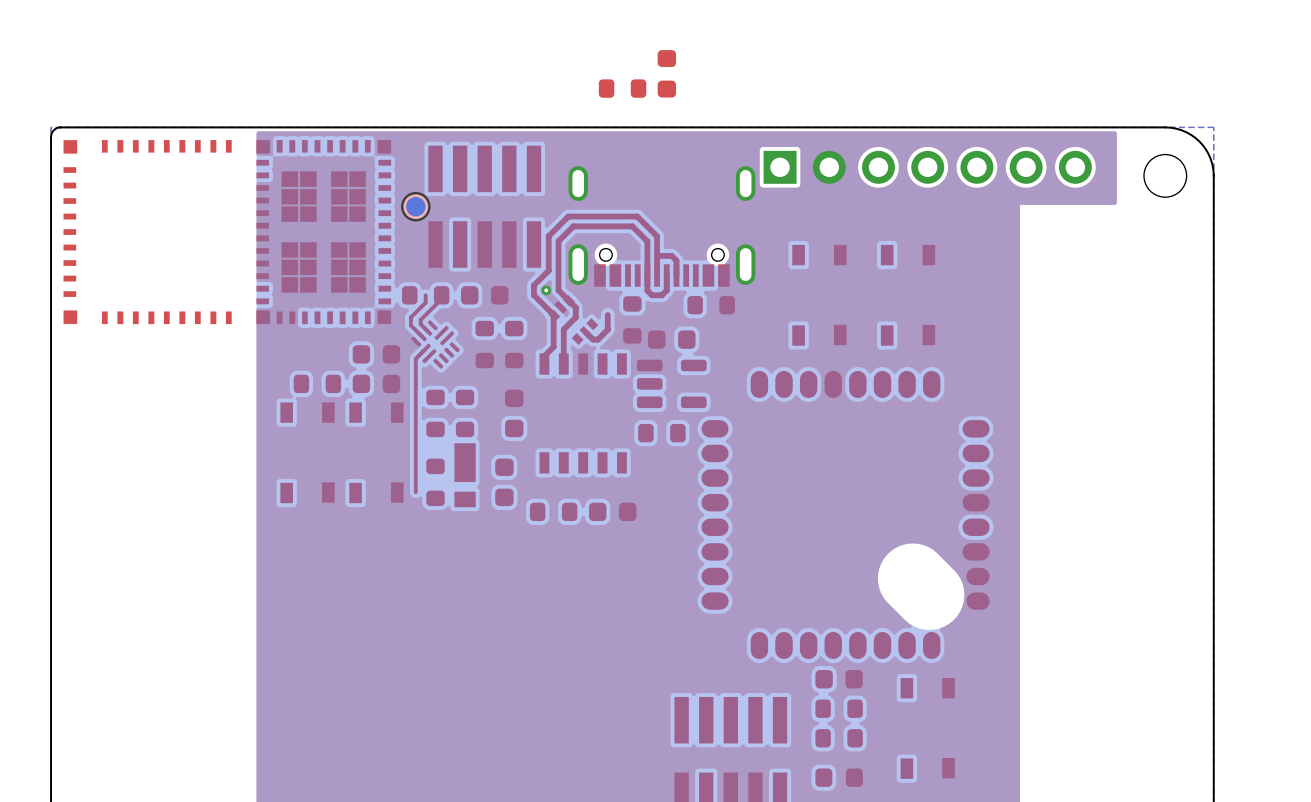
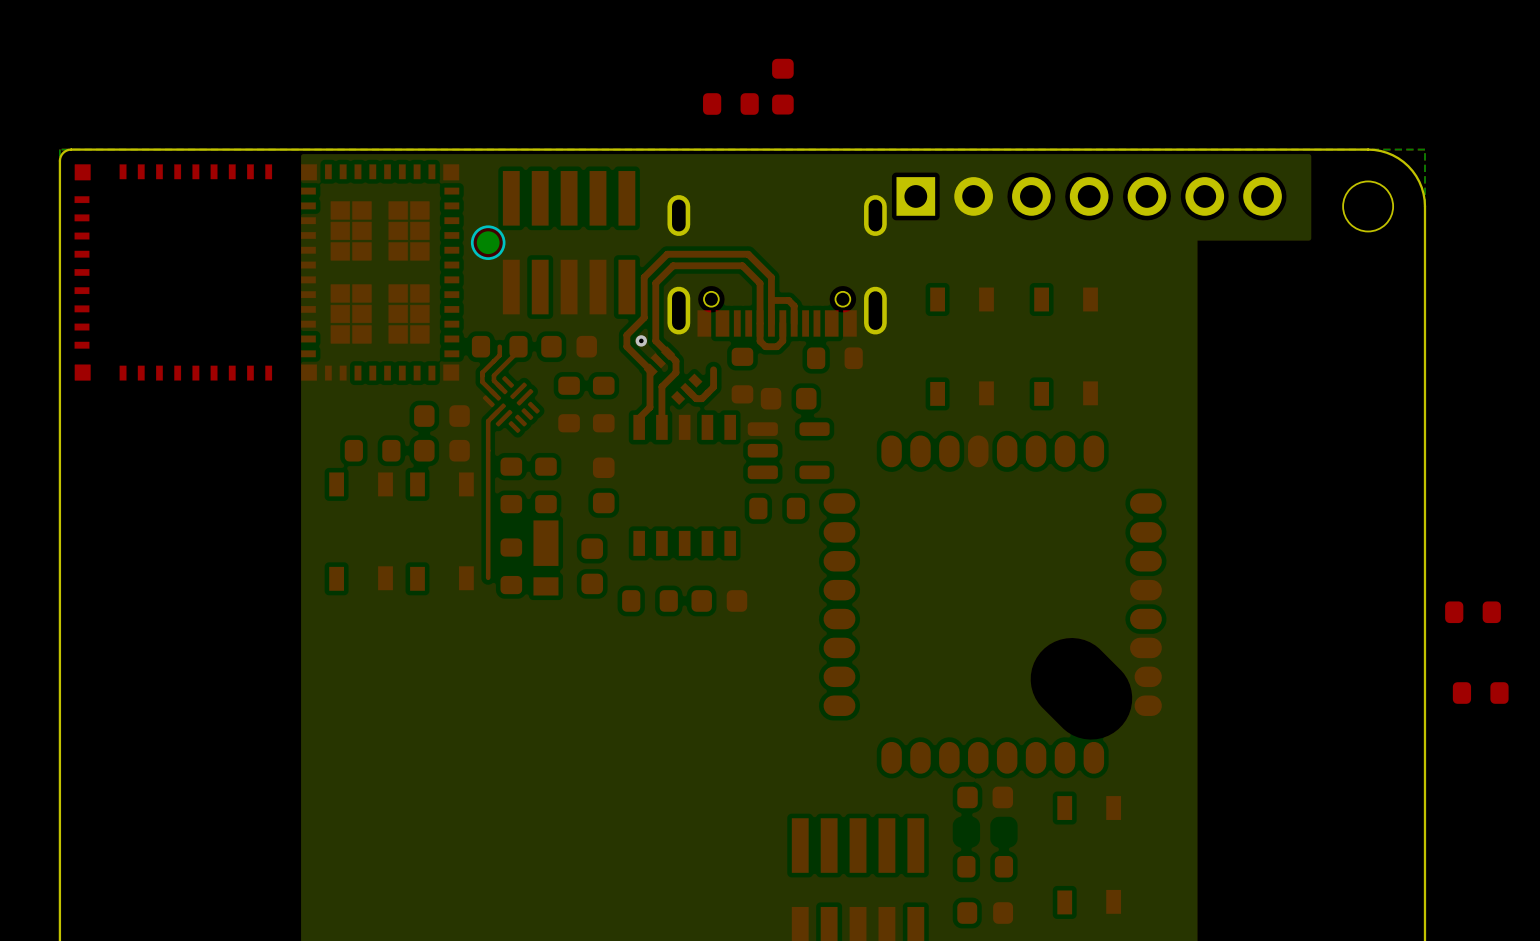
part: none -> (1472, 612)
part: none -> (1480, 693)
part: (839, 708) -> none

